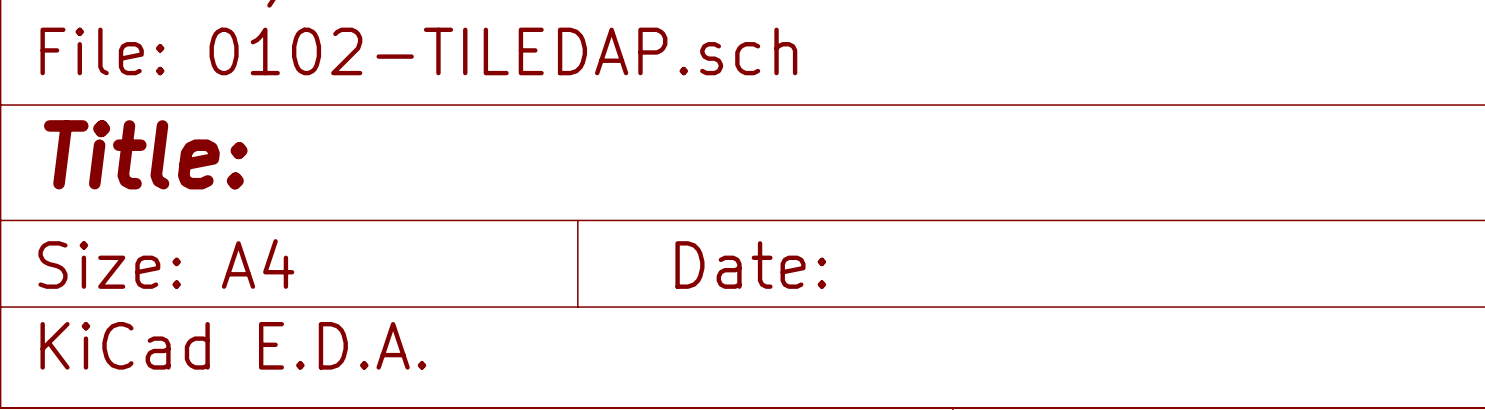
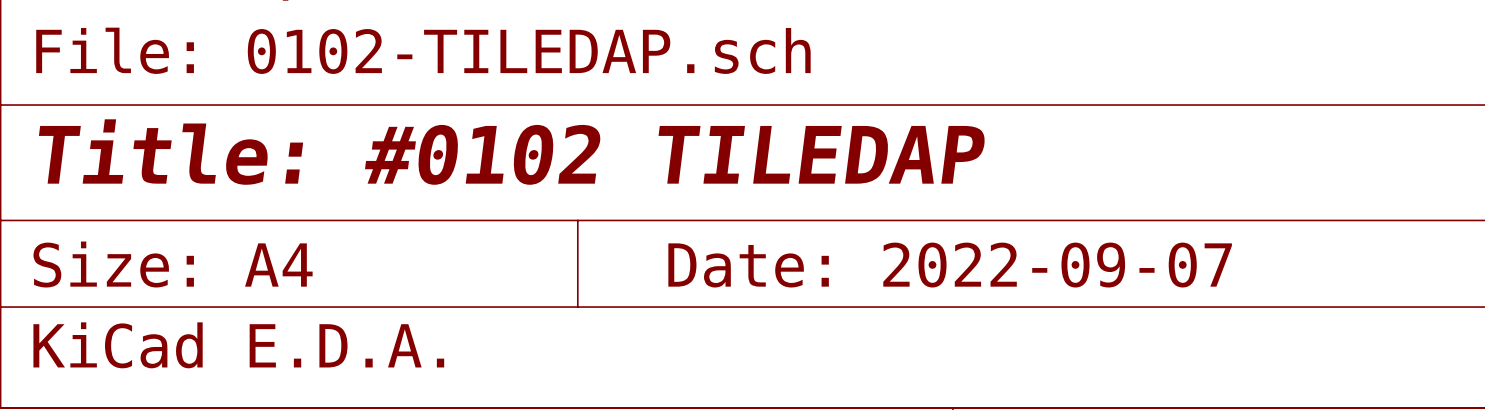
title block: Title: (145, 154) -> Title: #0102 TILEDAP (512, 152)
title block: Date: (750, 265) -> Date: 2022-09-07 (950, 265)

